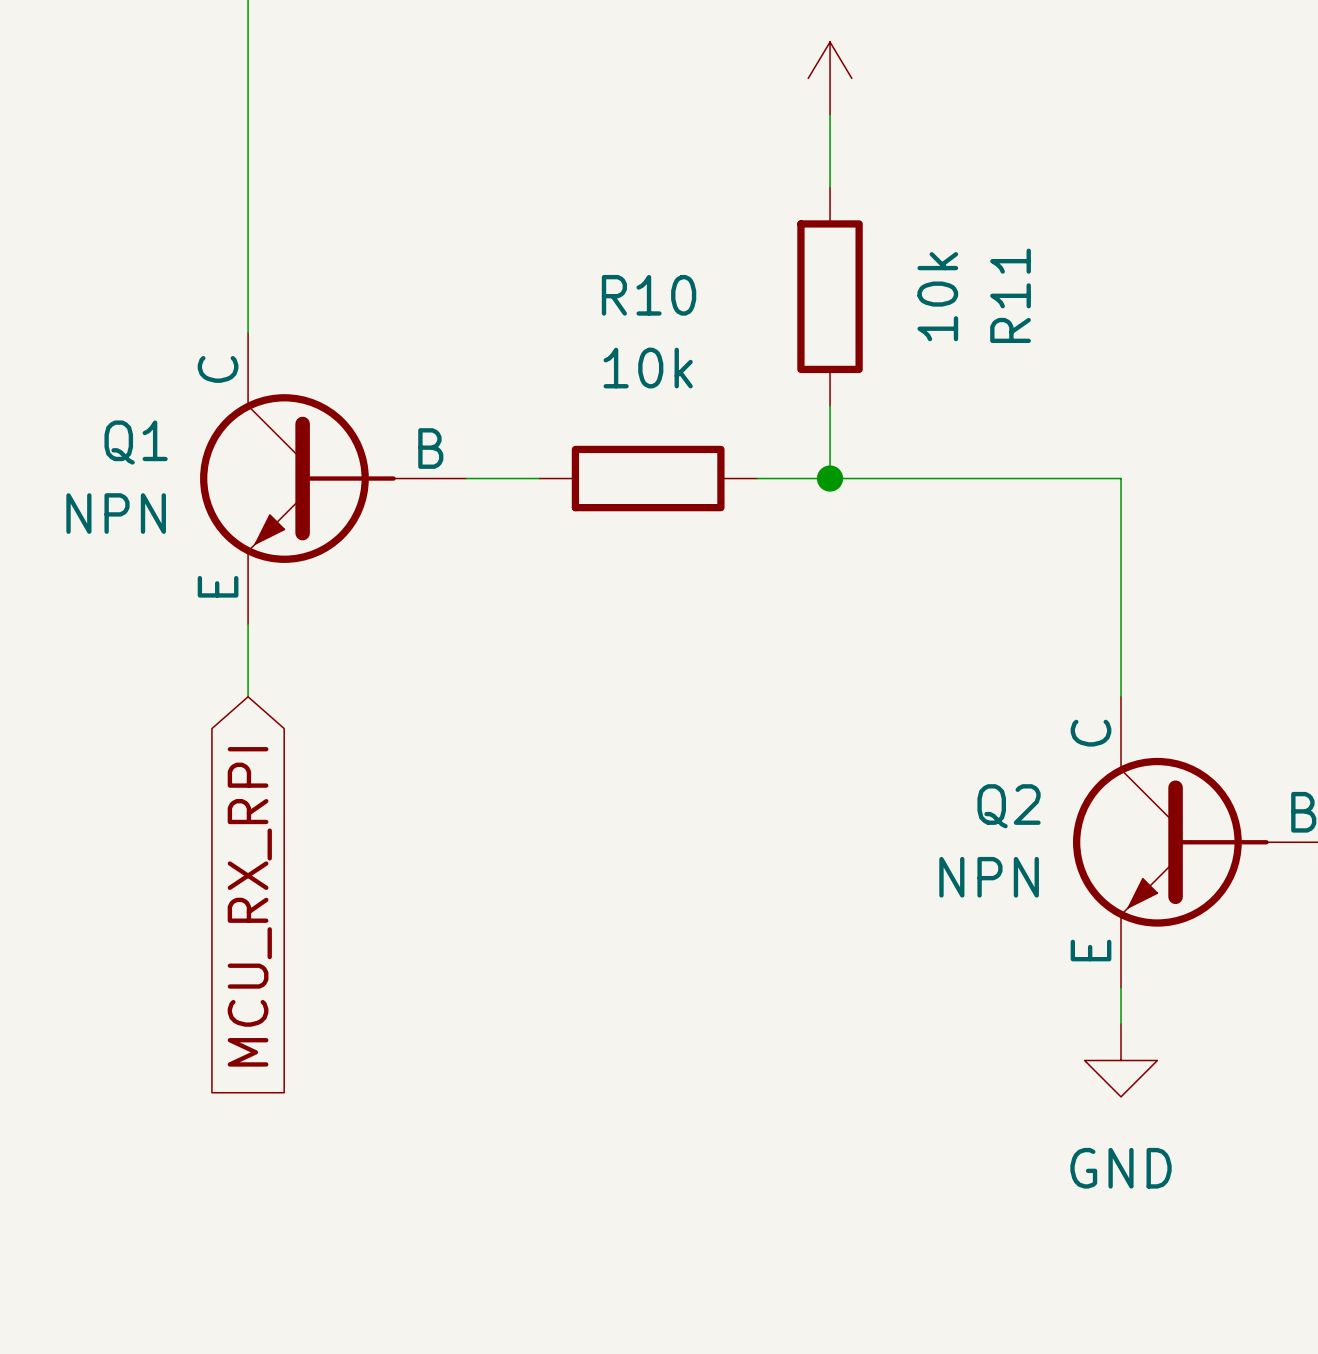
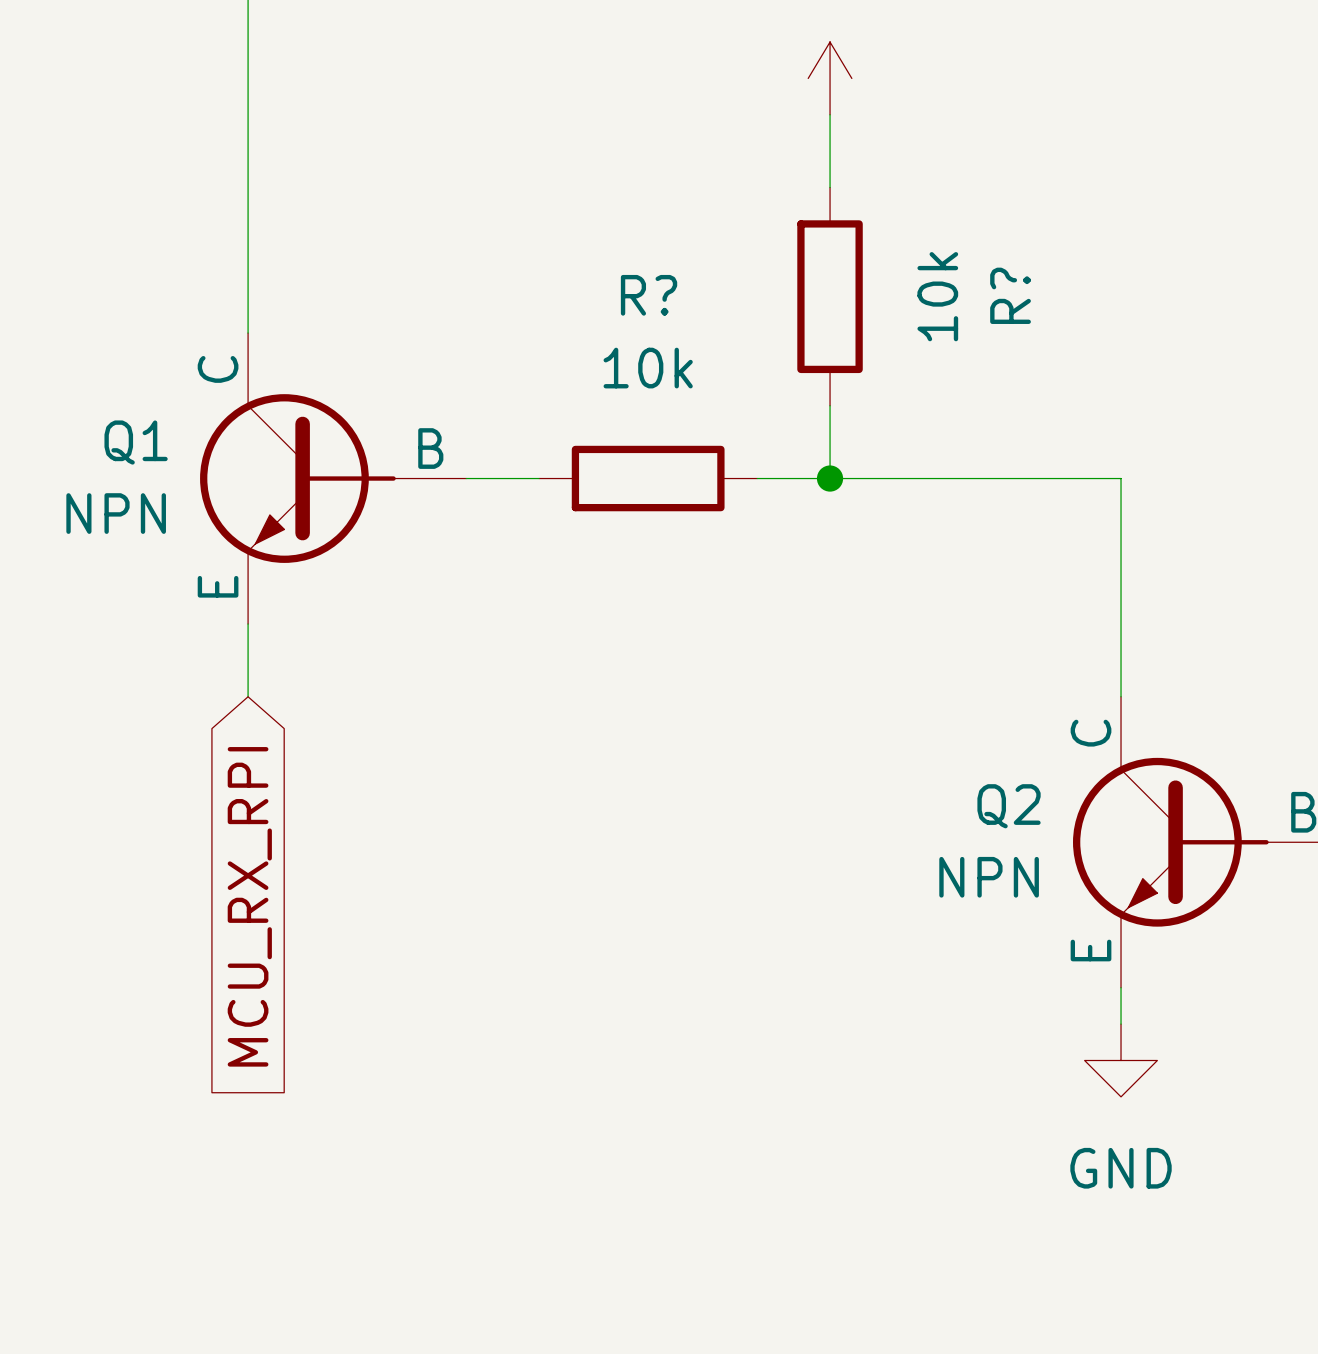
R10 name: R10 (649, 295) -> R? (649, 295)
R11 name: R11 (1010, 295) -> R? (1010, 295)

